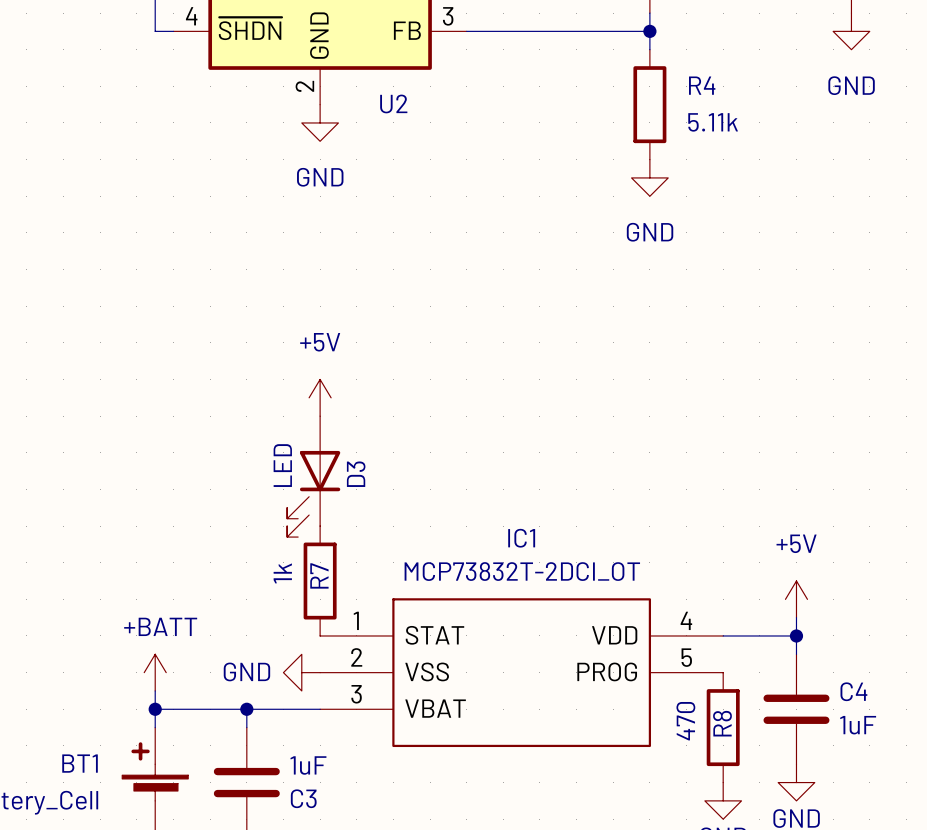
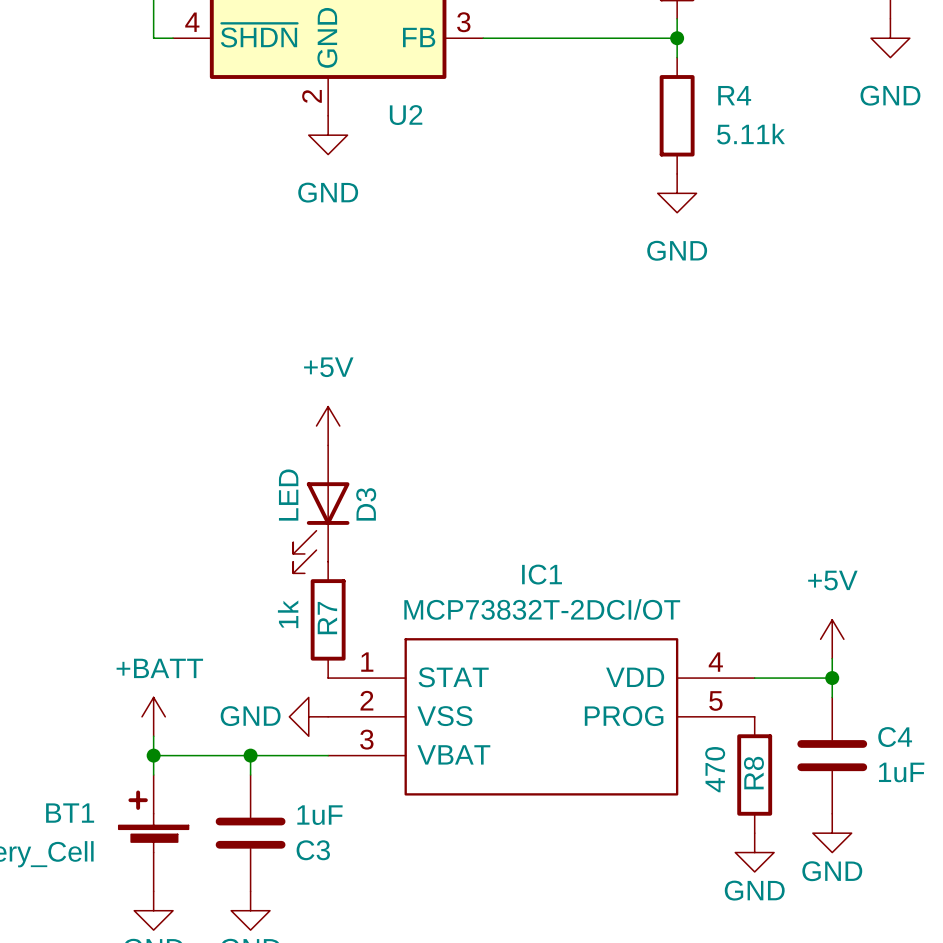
IC1 value: MCP73832T-2DCI_OT (522, 571) -> MCP73832T-2DCI/OT (542, 609)

